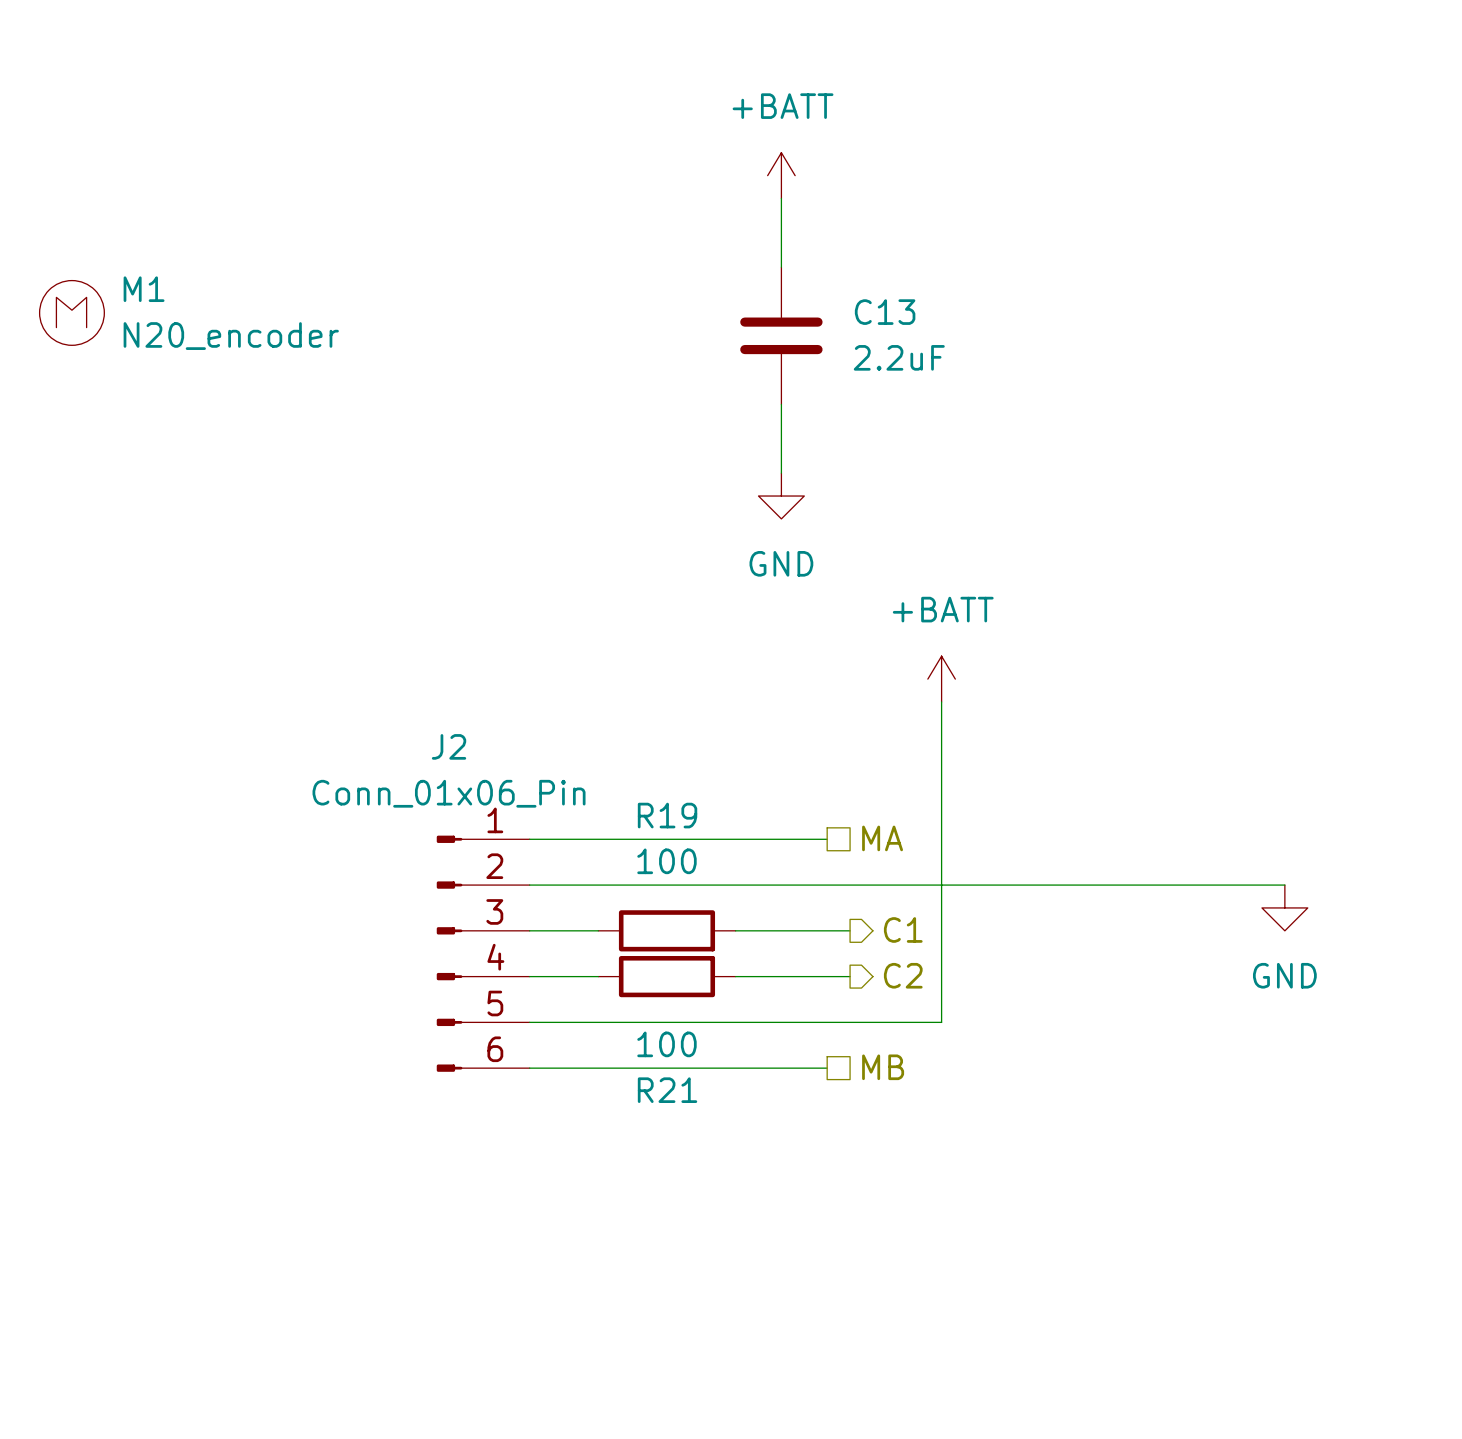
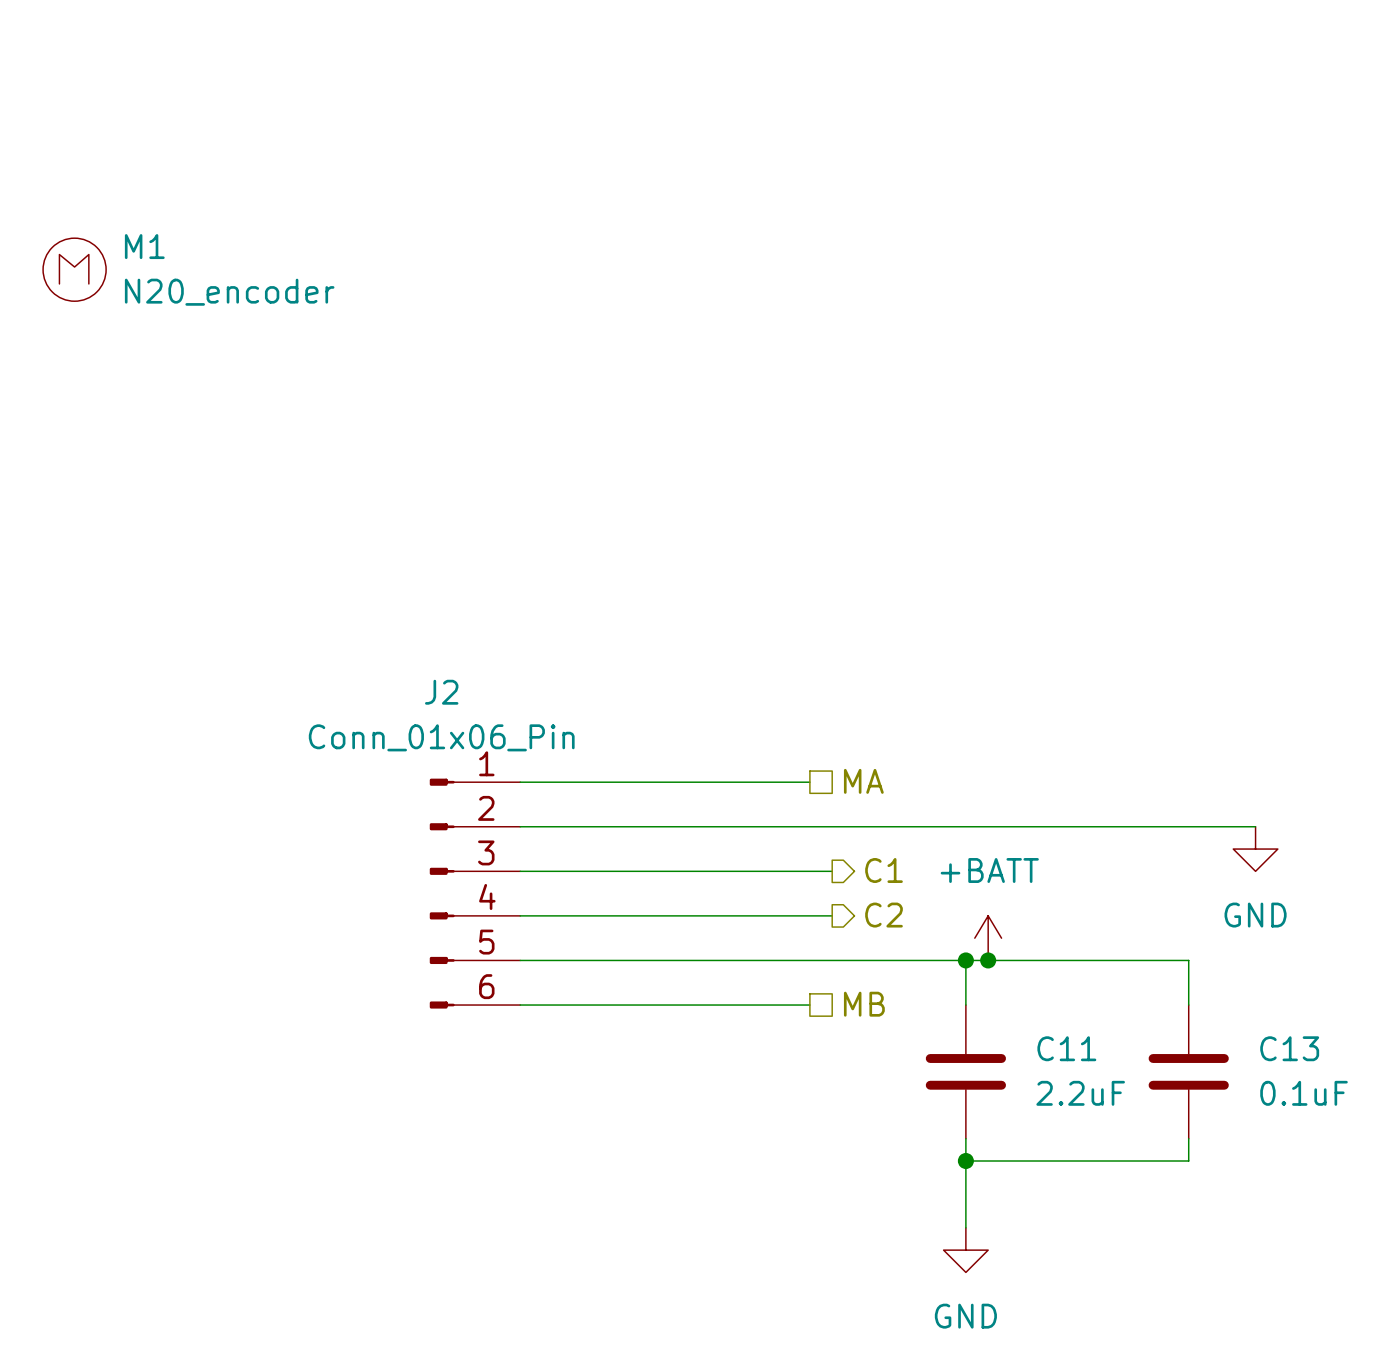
power symbol: +BATT (781, 175) -> none
wire: (781, 198) (781, 267) -> none
C13 position: (781, 335) -> (1188, 1071)
C13 value: 2.2uF (899, 357) -> 0.1uF (1304, 1093)
wire: (781, 404) (781, 473) -> none
power symbol: GND (781, 496) -> none
power symbol position: +BATT (941, 679) -> +BATT (988, 938)
wire: (941, 701) (941, 1022) -> (1188, 1005) (1188, 960) (921, 960)
wire: none -> (587, 871) (720, 871)
R19: 100 (666, 930) -> none
wire: none -> (587, 915) (720, 915)
R21: 100 (666, 976) -> none
wire: none -> (965, 960) (965, 1005)
junction: none -> (965, 960)
junction: none -> (988, 960)
C11: none -> 2.2uF (965, 1071)
wire: none -> (965, 1138) (965, 1227)
wire: none -> (1188, 1138) (1188, 1161) (965, 1161)
junction: none -> (965, 1161)
power symbol: none -> GND (965, 1250)

